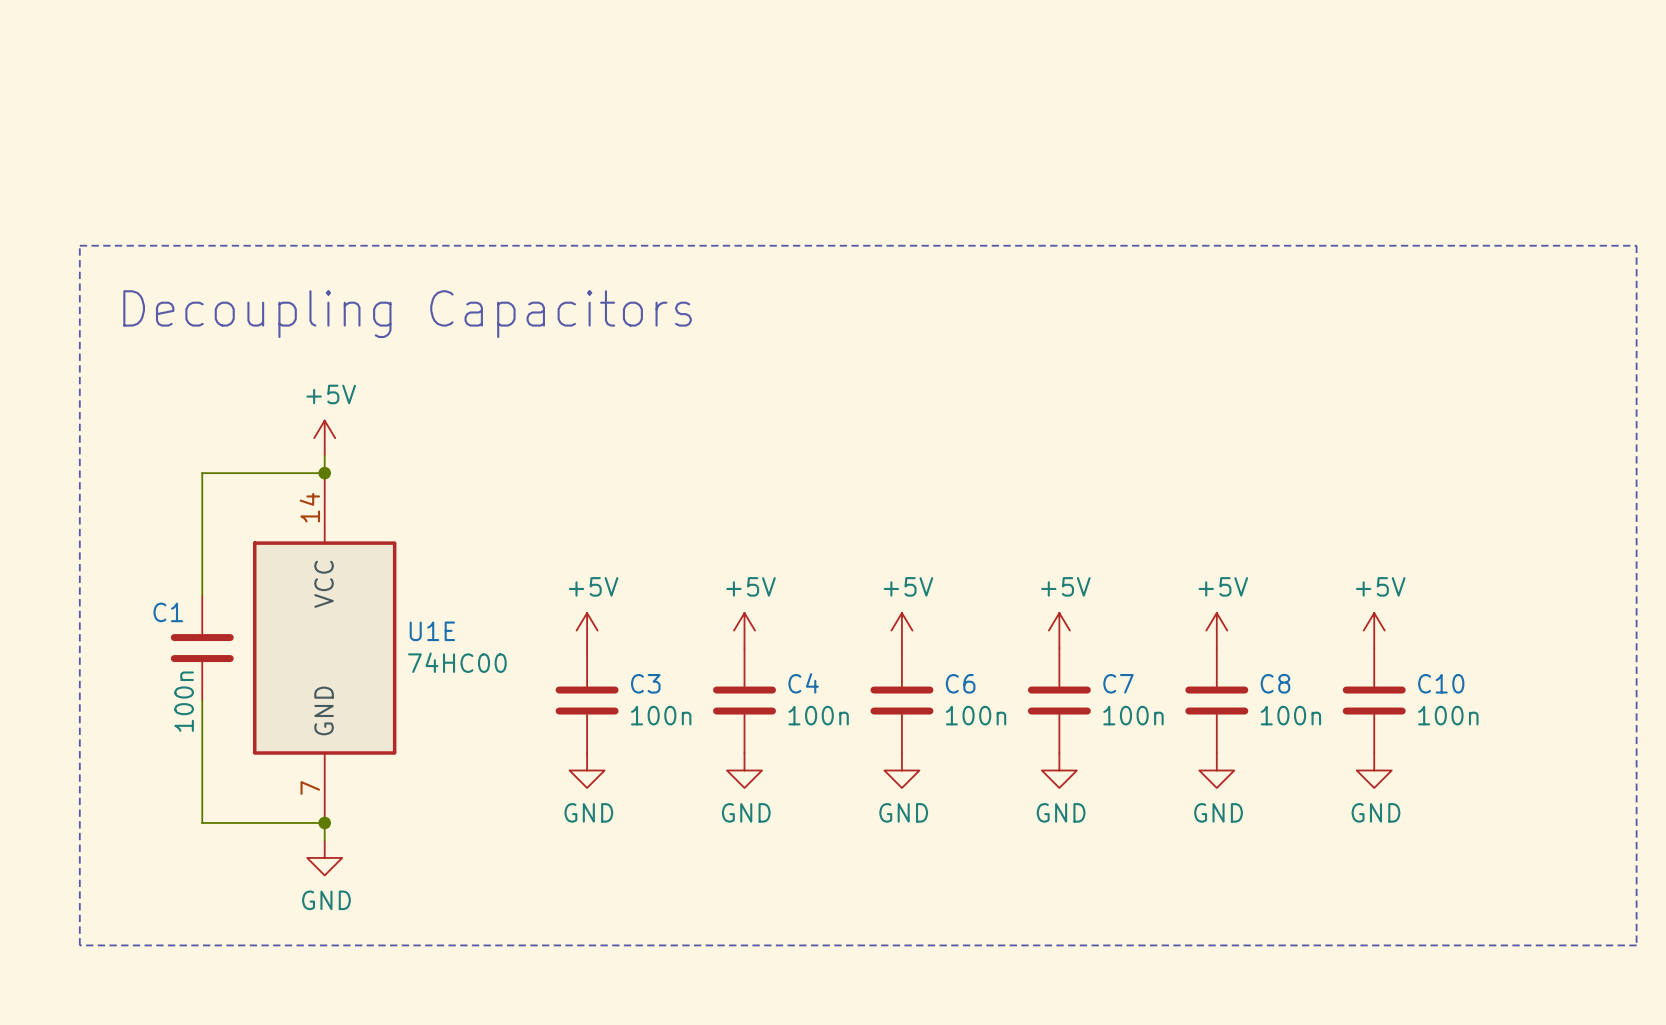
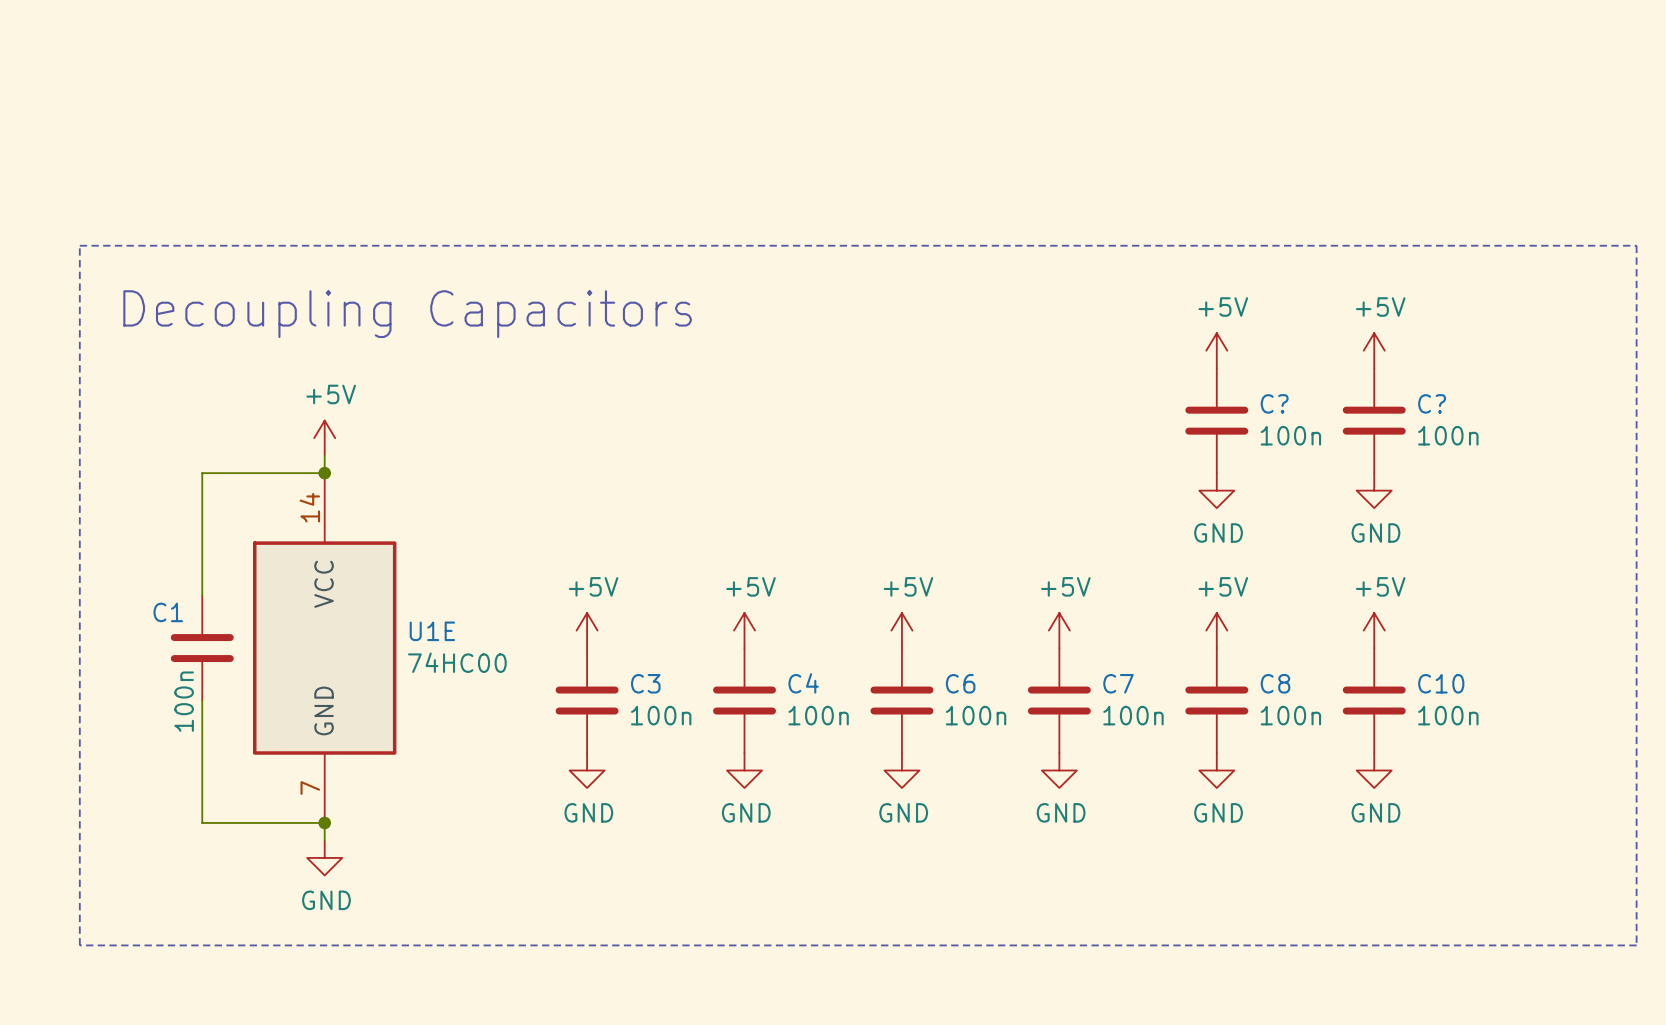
power symbol: none -> +5V (1216, 350)
power symbol: none -> +5V (1374, 350)
C?: none -> 100n (1216, 420)
C?: none -> 100n (1374, 420)
power symbol: none -> GND (1216, 490)
power symbol: none -> GND (1374, 490)

